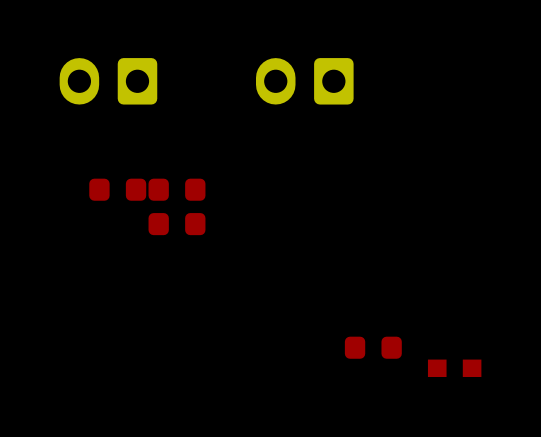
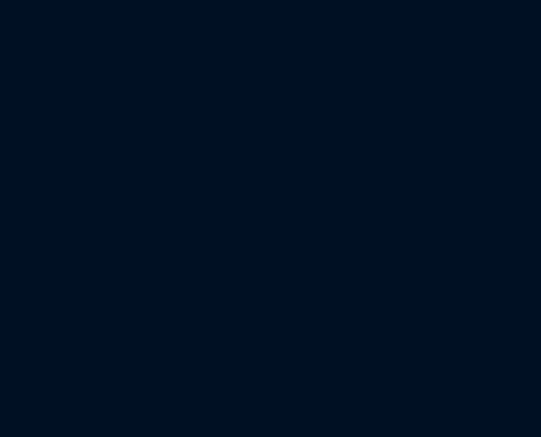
part: (108, 81) -> none
part: (304, 81) -> none
part: (117, 189) -> none
part: (176, 189) -> none
part: (176, 224) -> none
part: (373, 347) -> none
part: (454, 368) -> none

